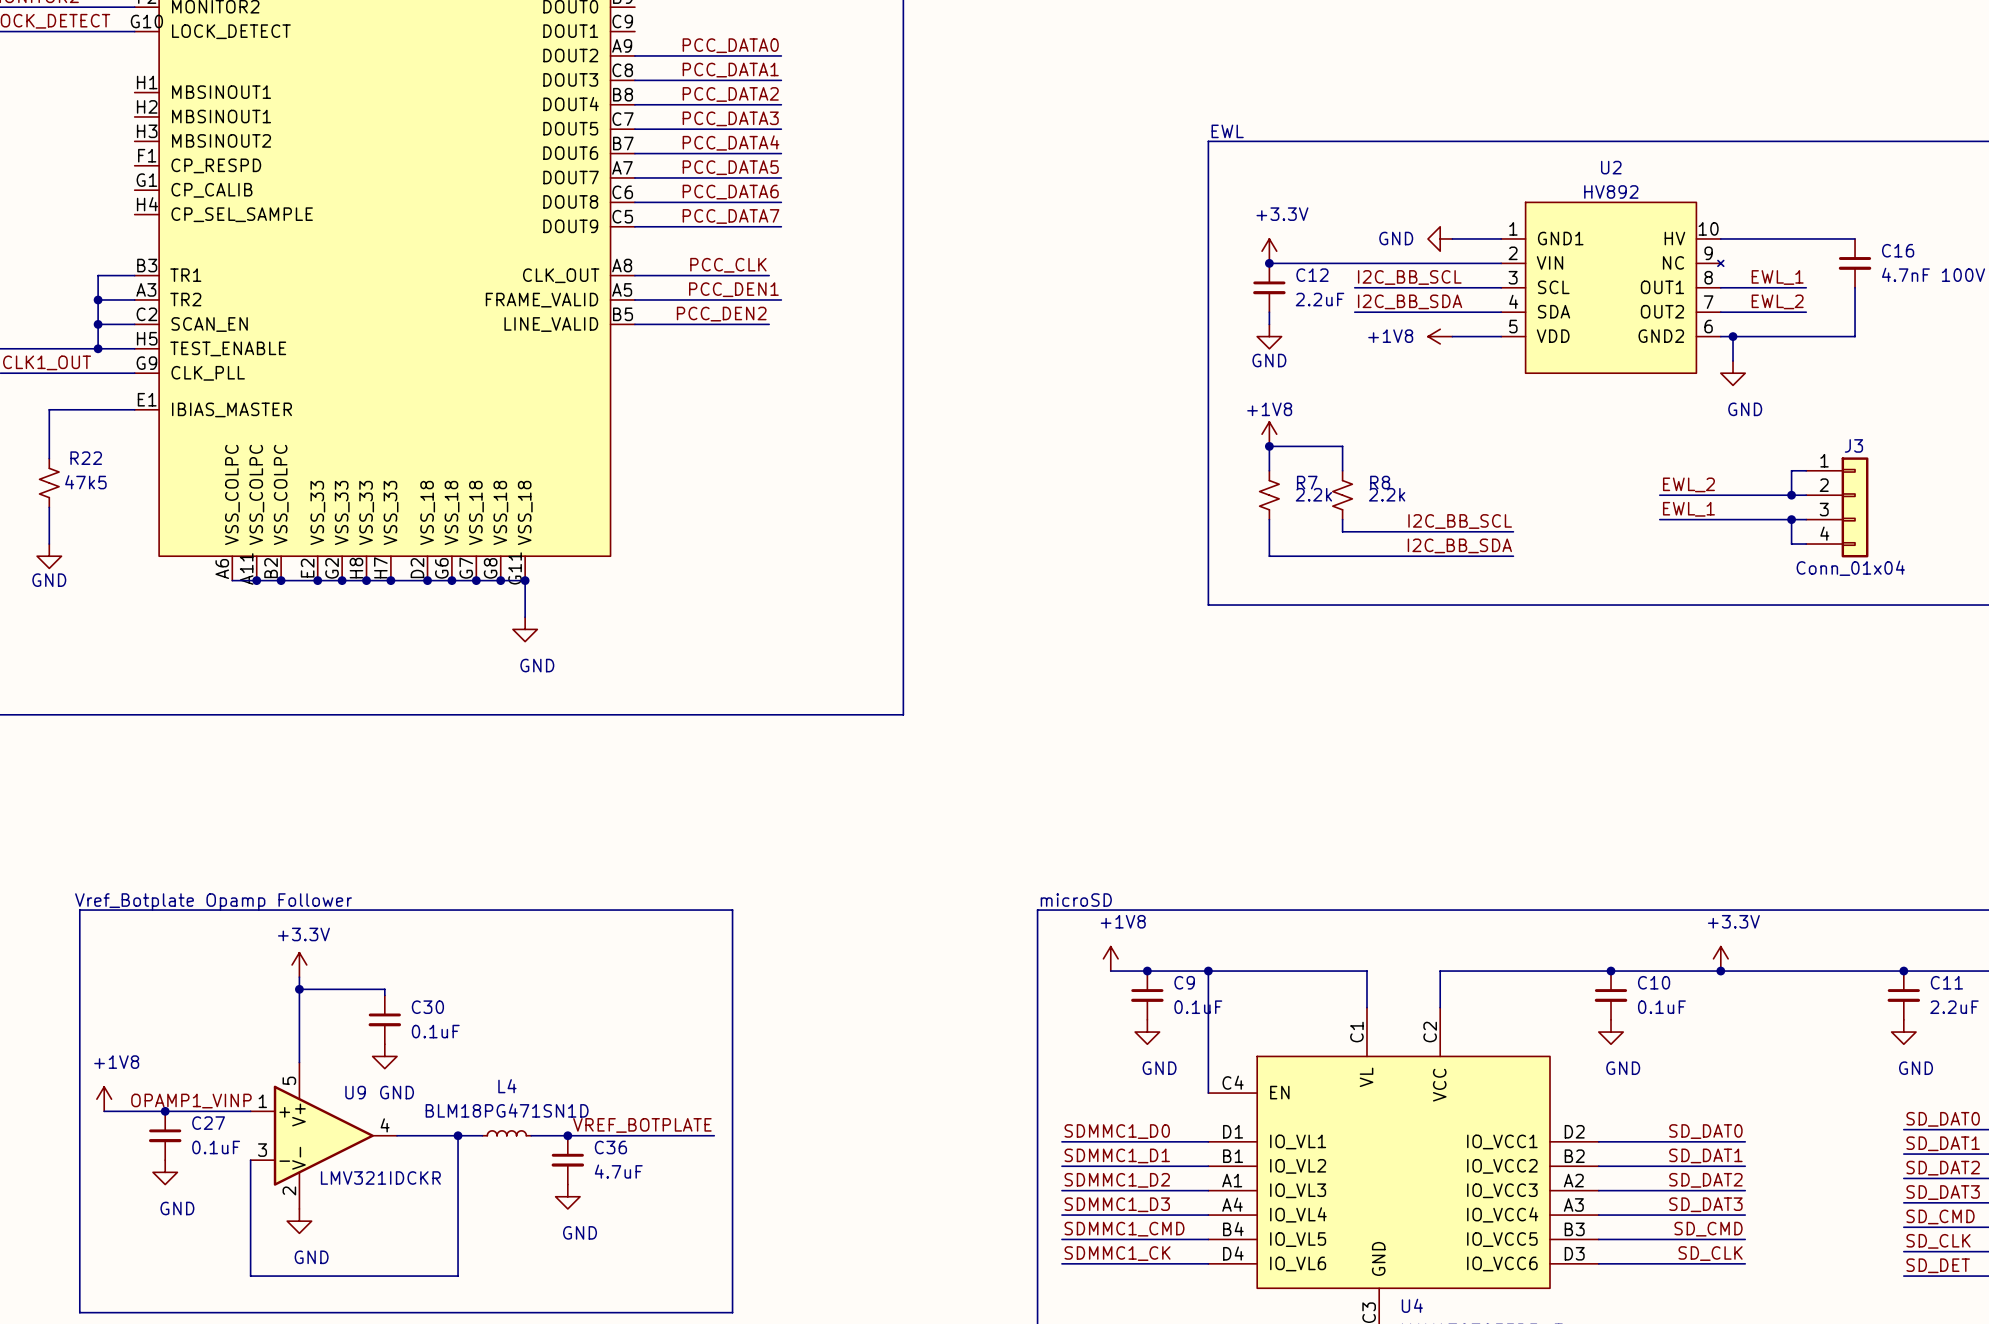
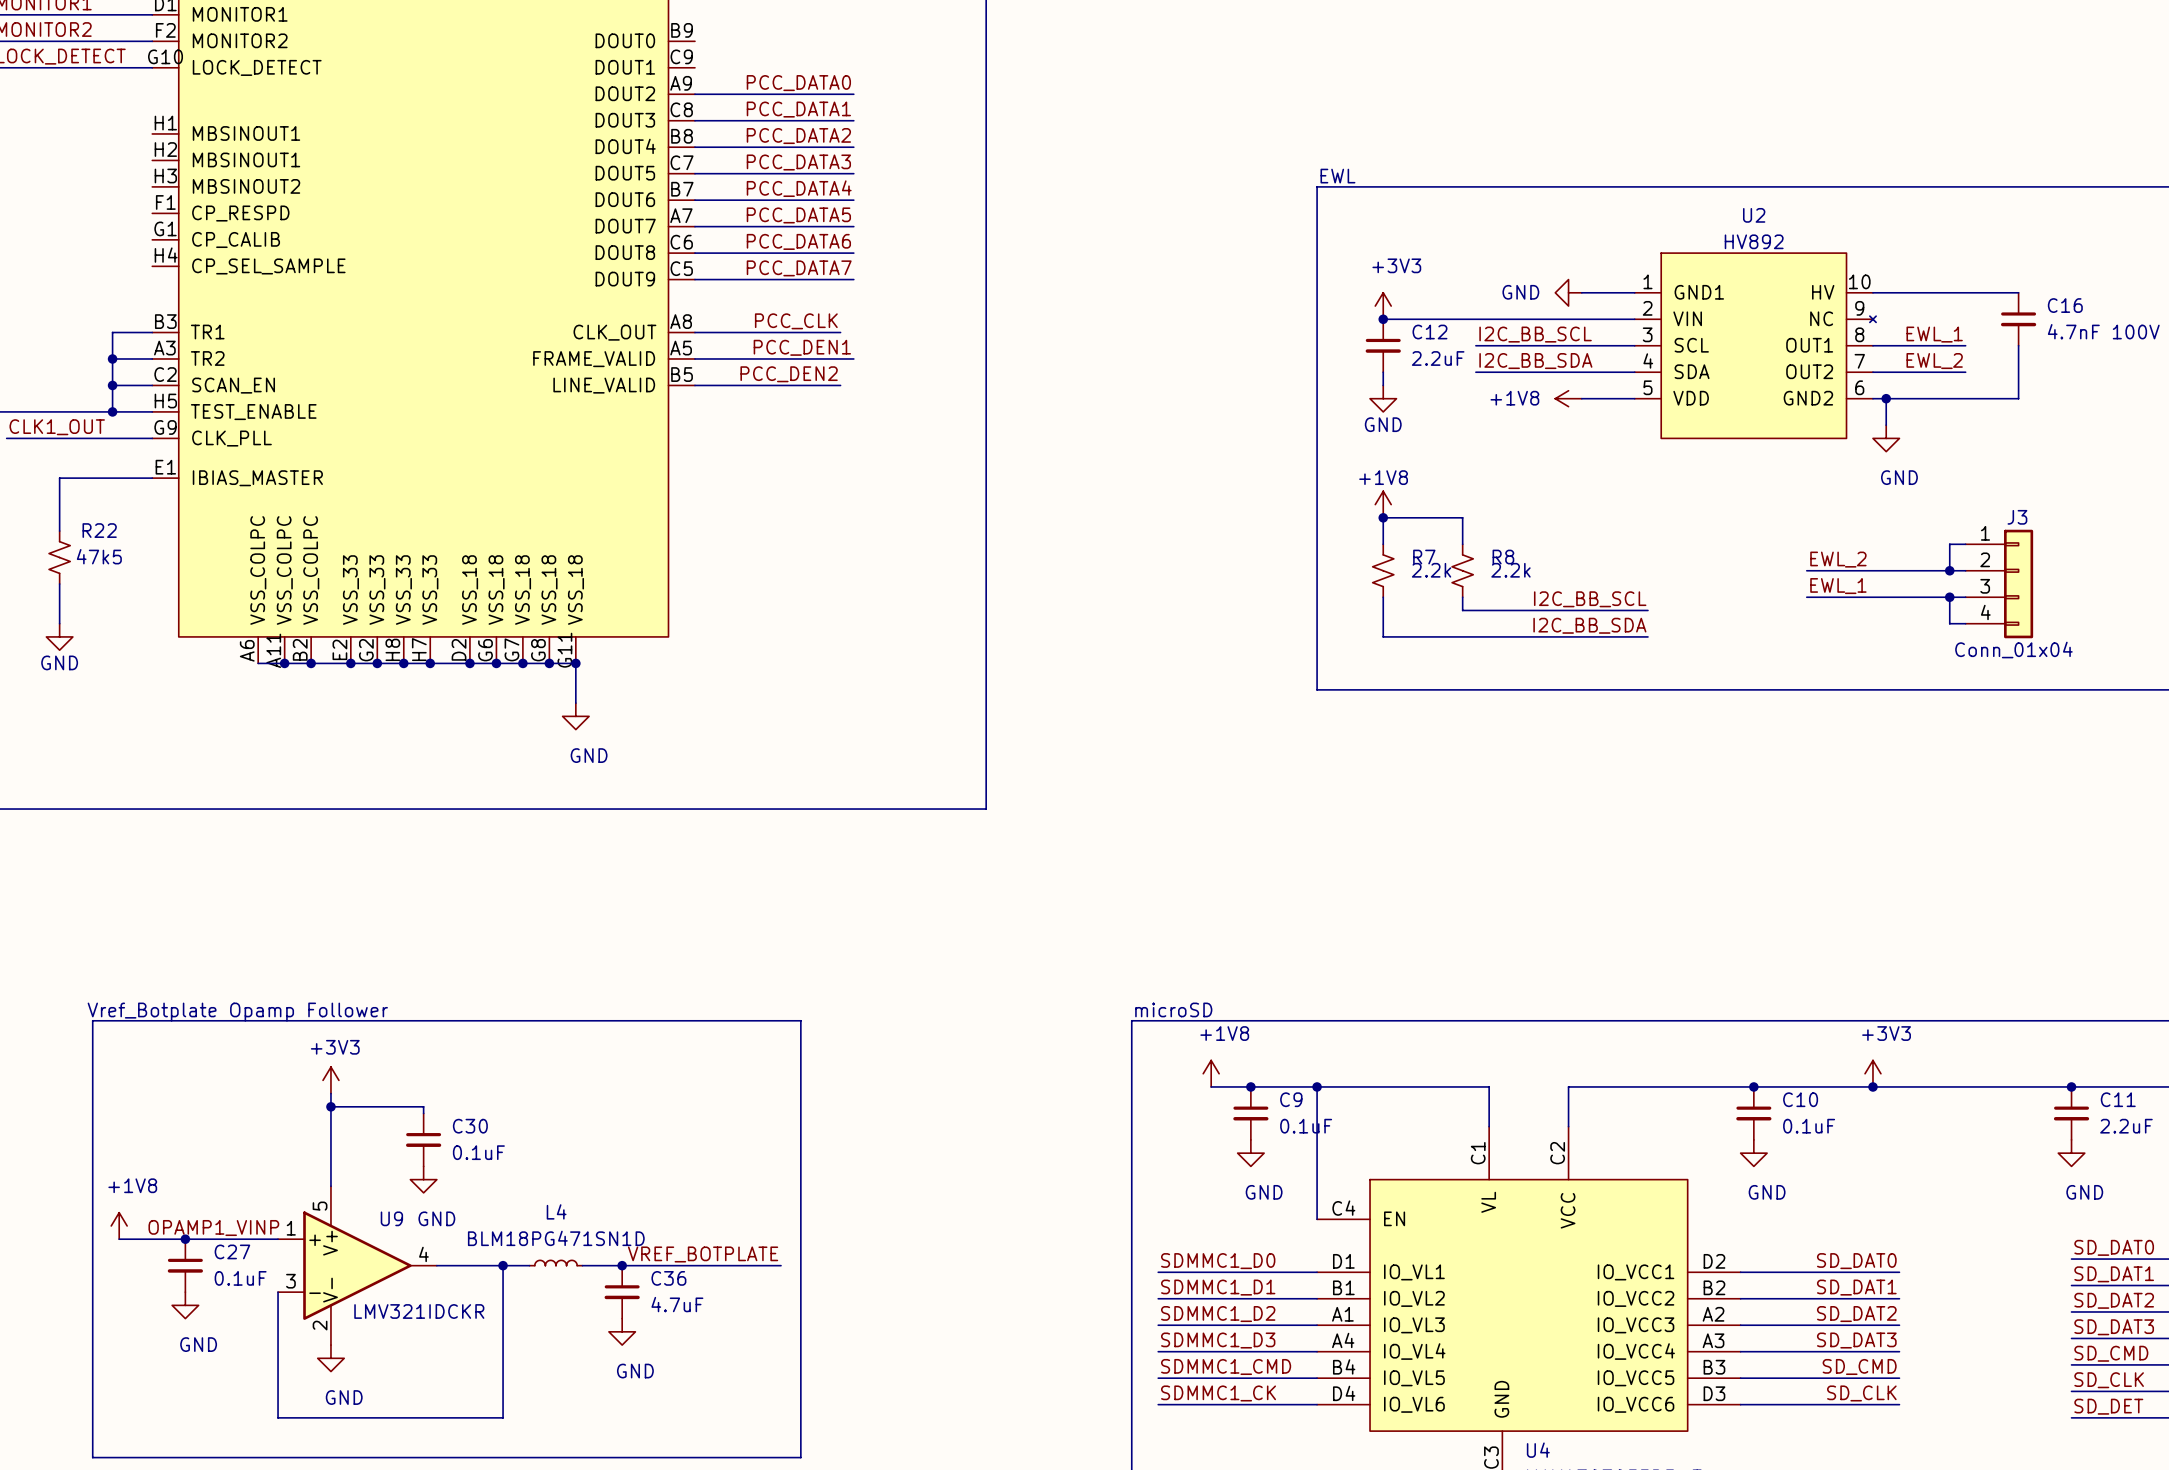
power symbol: +3.3V (1269, 251) -> +3V3 (1383, 306)
power symbol: +3.3V (1720, 958) -> +3V3 (1872, 1073)
power symbol: +3.3V (299, 964) -> +3V3 (330, 1080)

